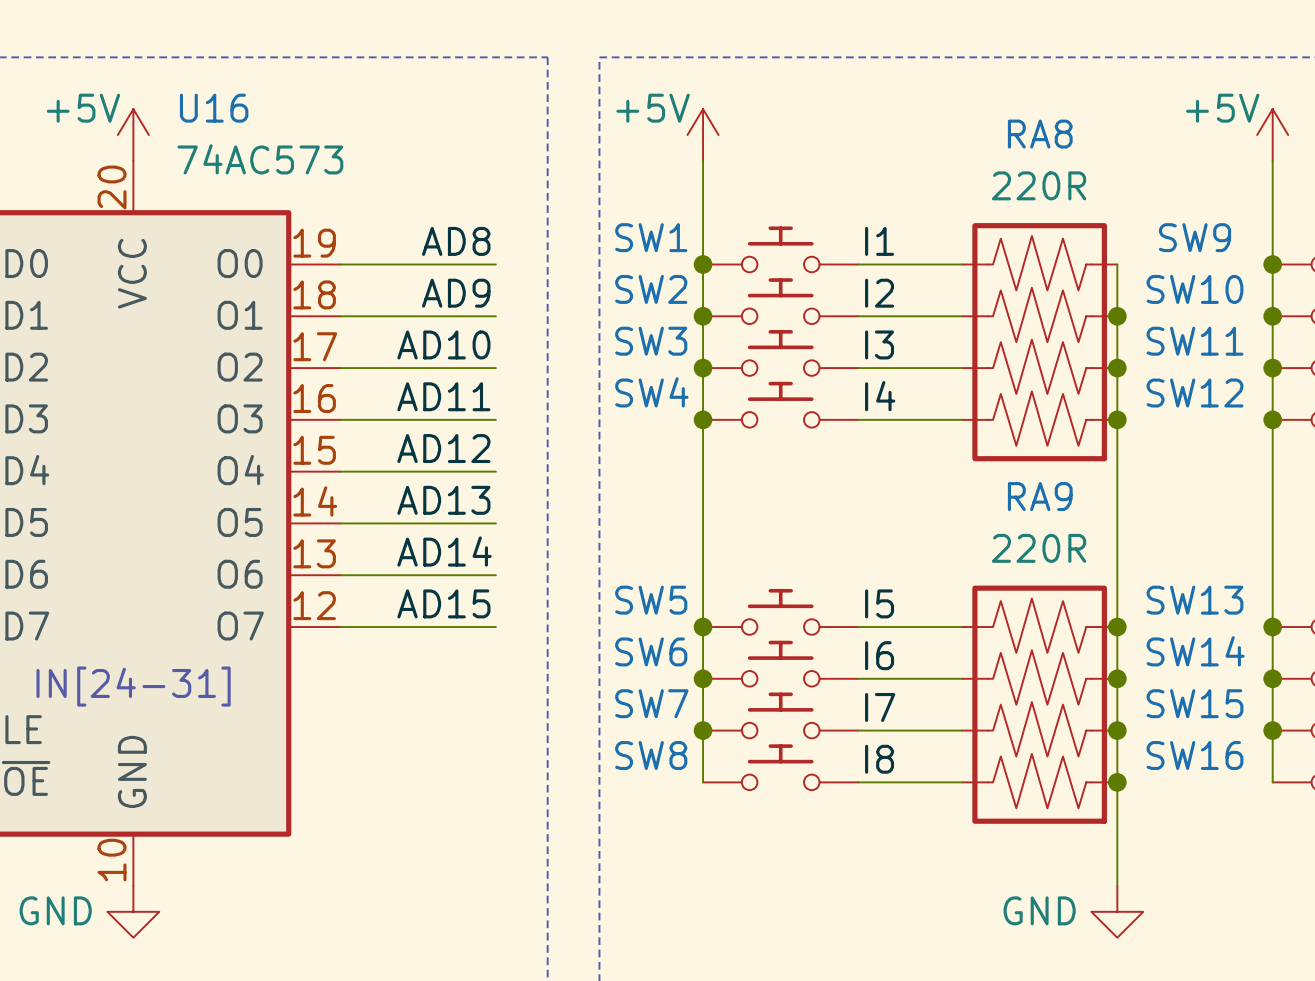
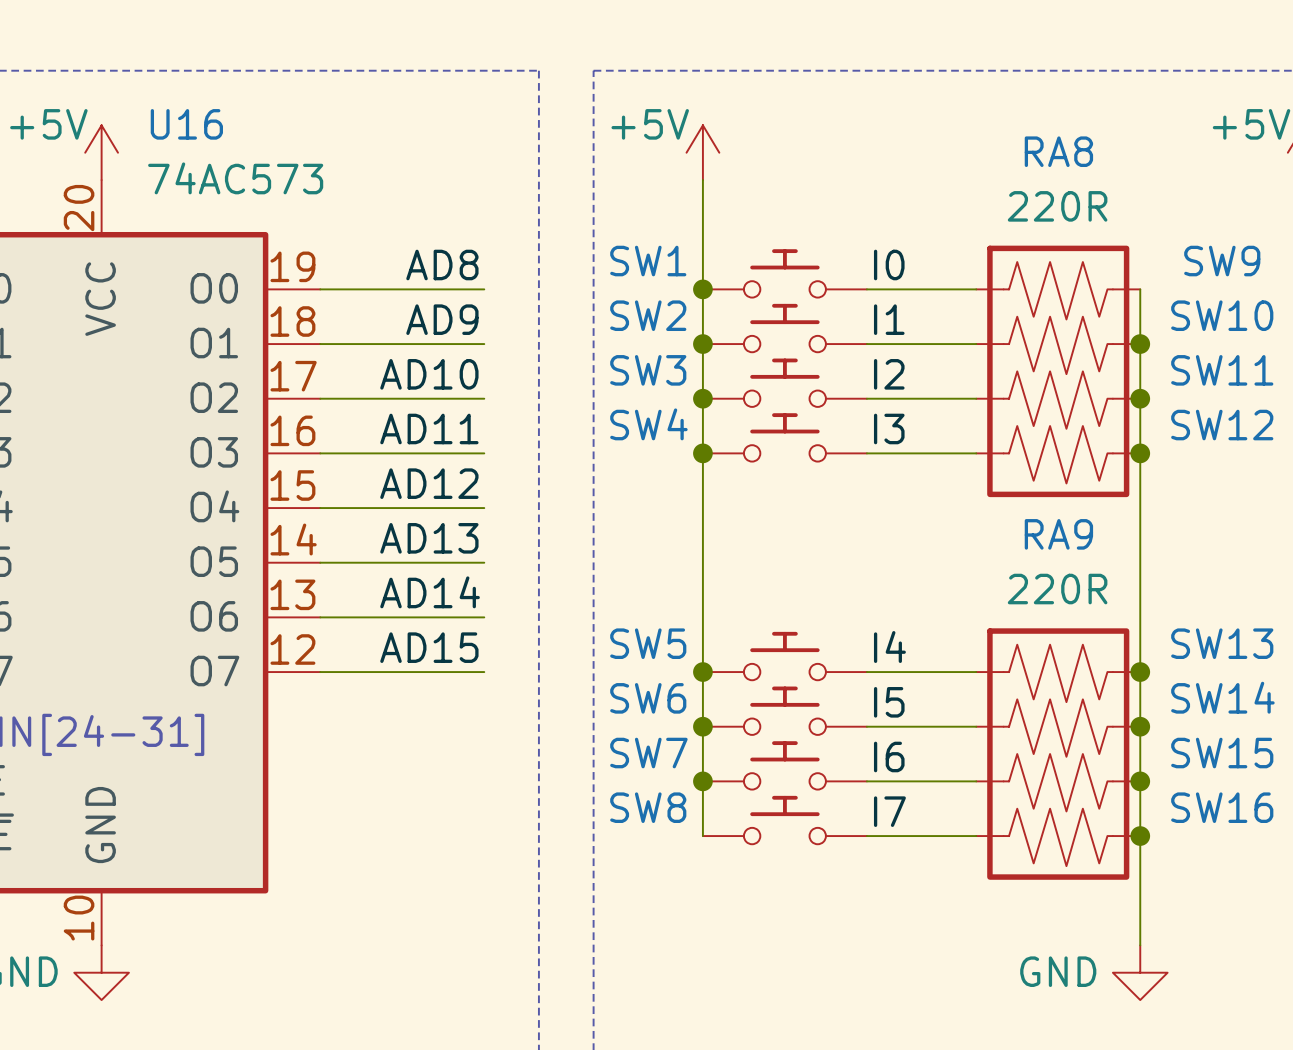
label: I1 (879, 241) -> I0 (889, 264)
label: I2 (879, 293) -> I1 (889, 319)
RA8 rotation: 0° (1039, 342) -> 180° (1058, 371)
label: I3 (879, 344) -> I2 (889, 374)
label: I4 (880, 396) -> I3 (889, 428)
label: I5 (879, 603) -> I4 (889, 647)
label: I6 (879, 655) -> I5 (889, 702)
RA9 rotation: 0° (1039, 704) -> 180° (1058, 754)
label: I7 (880, 707) -> I6 (889, 756)
label: I8 (879, 759) -> I7 (889, 811)

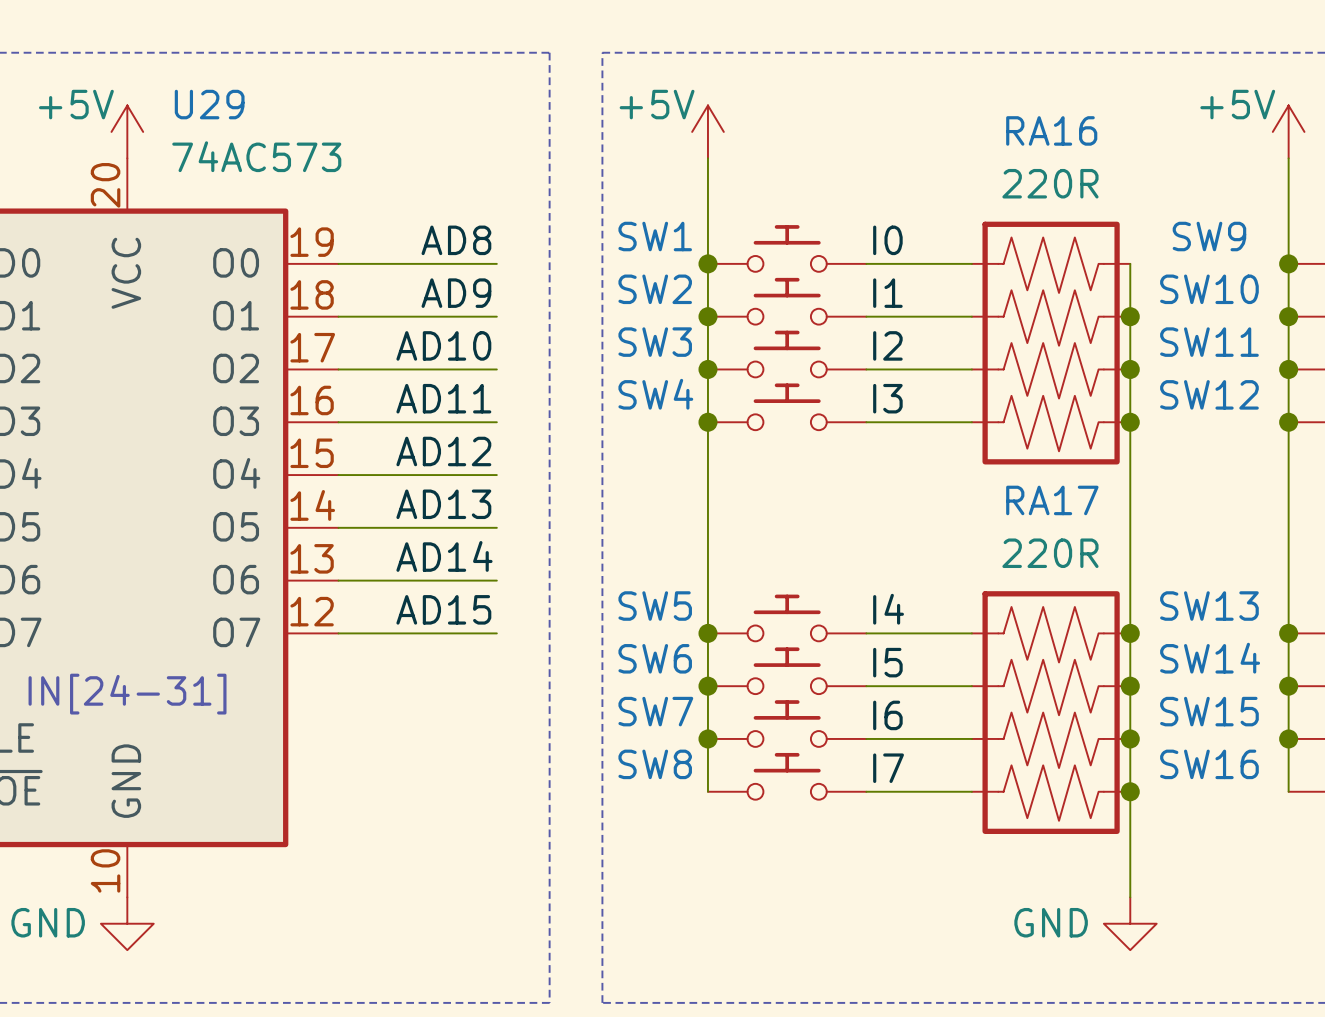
U16 name: U16 (186, 124) -> U29 (209, 104)
RA8 name: RA8 (1058, 151) -> RA16 (1051, 130)
RA9 name: RA9 (1058, 534) -> RA17 (1052, 500)

